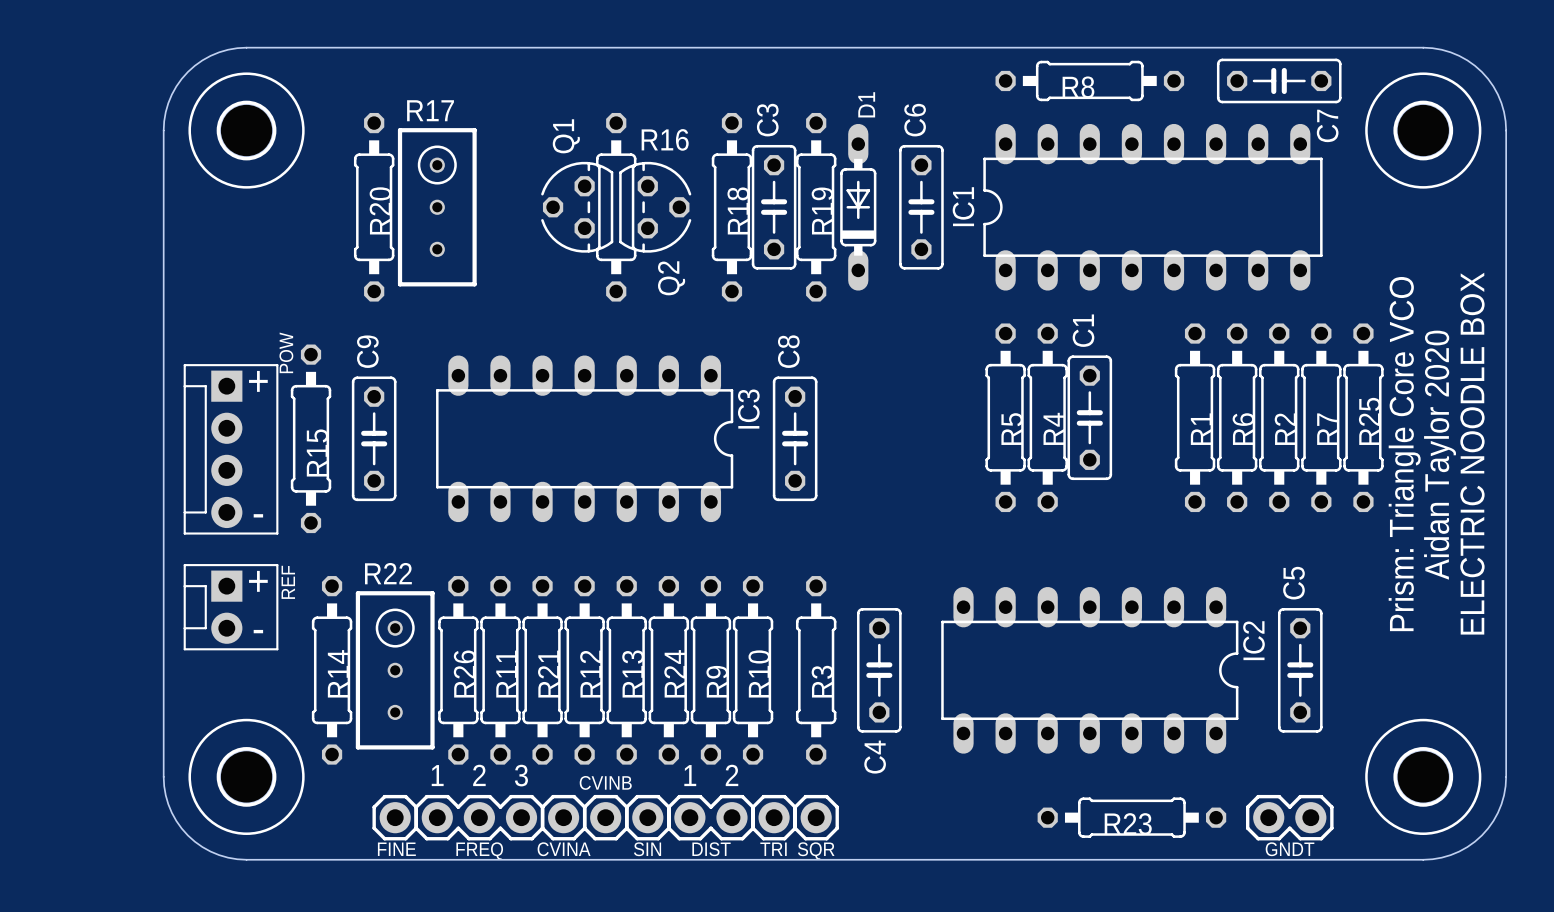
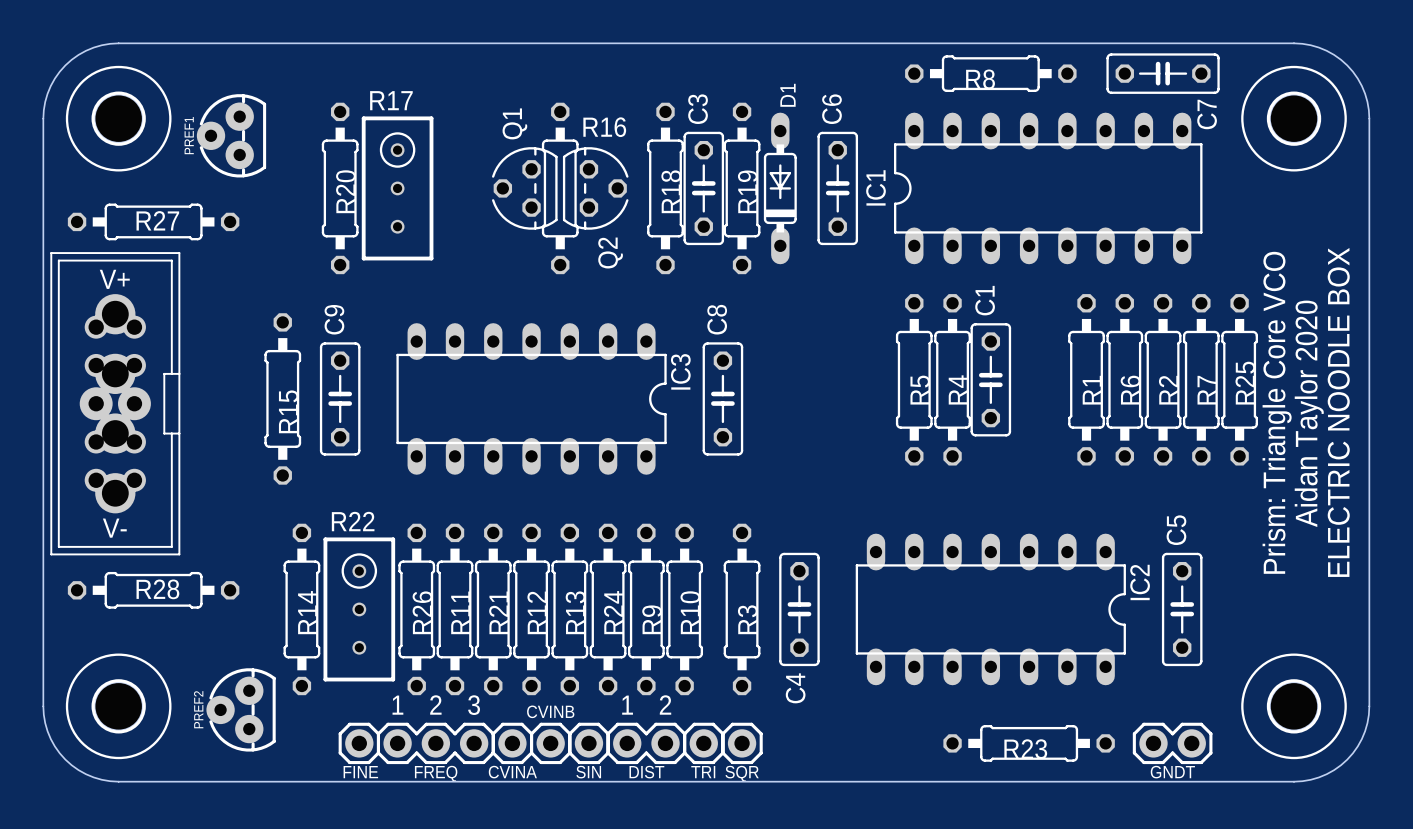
board edge: (246, 47) (219, 52) (202, 60) (187, 71) (176, 86) (168, 103) (163, 130) (164, 786) (168, 804) (176, 820) (194, 841) (219, 855) (246, 859) -> (224, 43) (118, 43) (101, 45) (85, 50) (71, 59) (54, 78) (47, 93) (43, 118) (43, 706) (45, 723) (50, 739) (59, 753) (71, 765) (93, 777) (118, 781) (224, 781)
part position: (246, 130) -> (118, 118)
PREF1: none -> (231, 135)
R27: none -> (153, 221)
text: + (258, 381) -> none
part: none -> (115, 403)
POW: (231, 449) -> none
text: - (258, 515) -> none
text: + (258, 581) -> none
REF: (231, 607) -> none
text: - (258, 631) -> none
R28: none -> (153, 590)
part position: (246, 776) -> (118, 706)
PREF2: none -> (241, 709)

